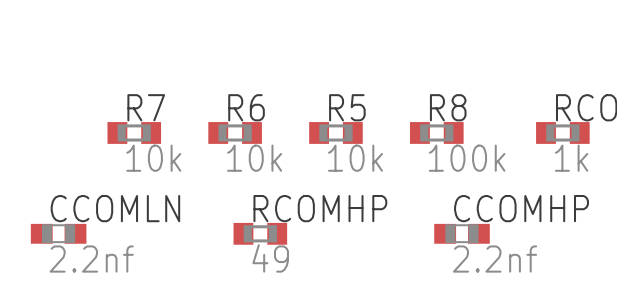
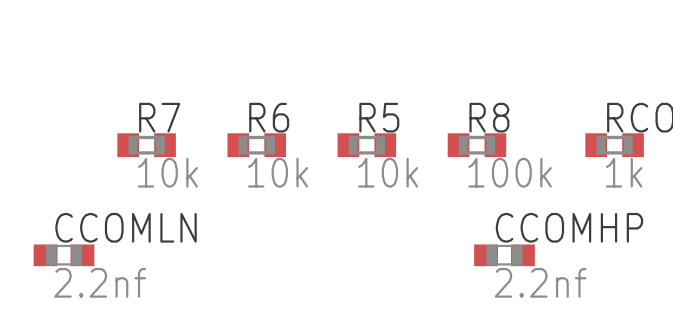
RCOMHP: 49 (260, 233) -> none

